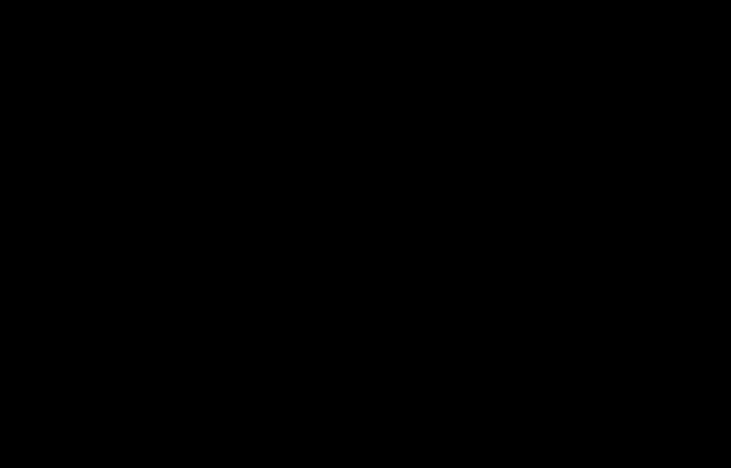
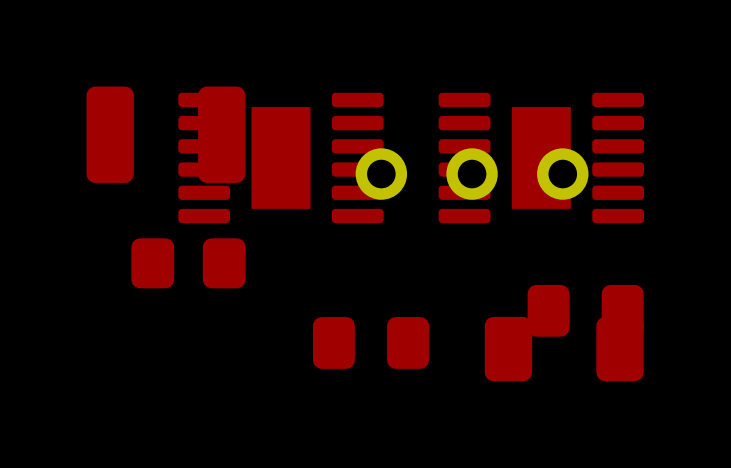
part: none -> (165, 134)
part: none -> (280, 157)
part: none -> (541, 157)
part: none -> (472, 174)
part: none -> (188, 263)
part: none -> (585, 310)
part: none -> (370, 342)
part: none -> (564, 349)

